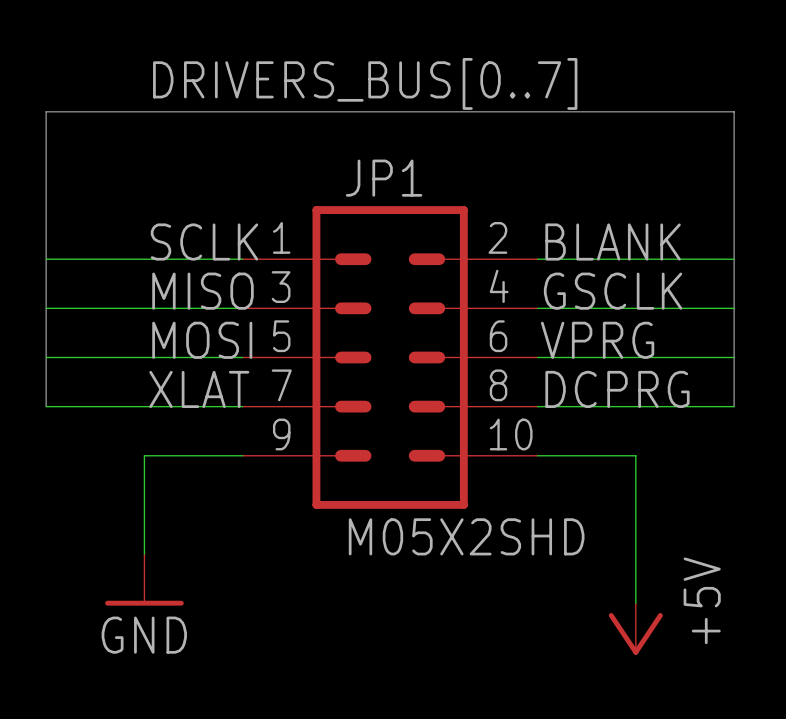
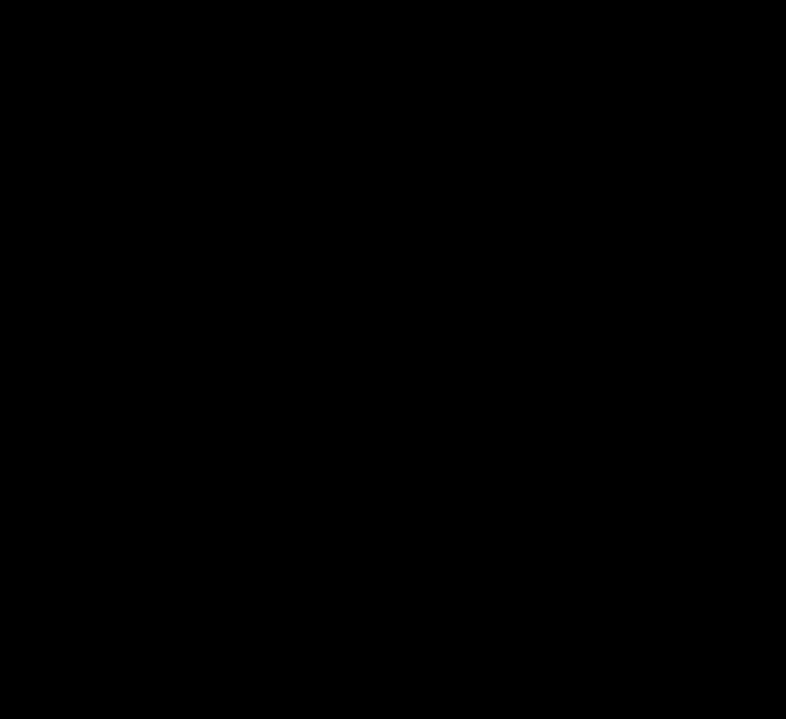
label: DRIVERS_BUS[0..7] (365, 83) -> none
text: SCLK (204, 242) -> none
text: BLANK (613, 242) -> none
wire: (46, 259) (242, 259) -> none
wire: (537, 259) (734, 259) -> none
text: MISO (203, 291) -> none
text: GSCLK (613, 291) -> none
wire: (46, 308) (242, 308) -> none
wire: (537, 308) (734, 308) -> none
text: MOSI (202, 340) -> none
text: VPRG (597, 340) -> none
wire: (46, 357) (242, 357) -> none
JP1: M05X2SHD (390, 357) -> none
wire: (537, 357) (734, 357) -> none
text: XLAT (199, 389) -> none
text: DCPRG (617, 389) -> none
bus: (46, 406) (46, 111) (734, 111) (734, 406) -> none
wire: (46, 406) (242, 406) -> none
wire: (537, 406) (734, 406) -> none
wire: (242, 455) (144, 455) (144, 554) -> none
wire: (537, 455) (635, 455) (635, 603) -> none
power symbol: GND (144, 579) -> none
power symbol: +5V (635, 628) -> none

